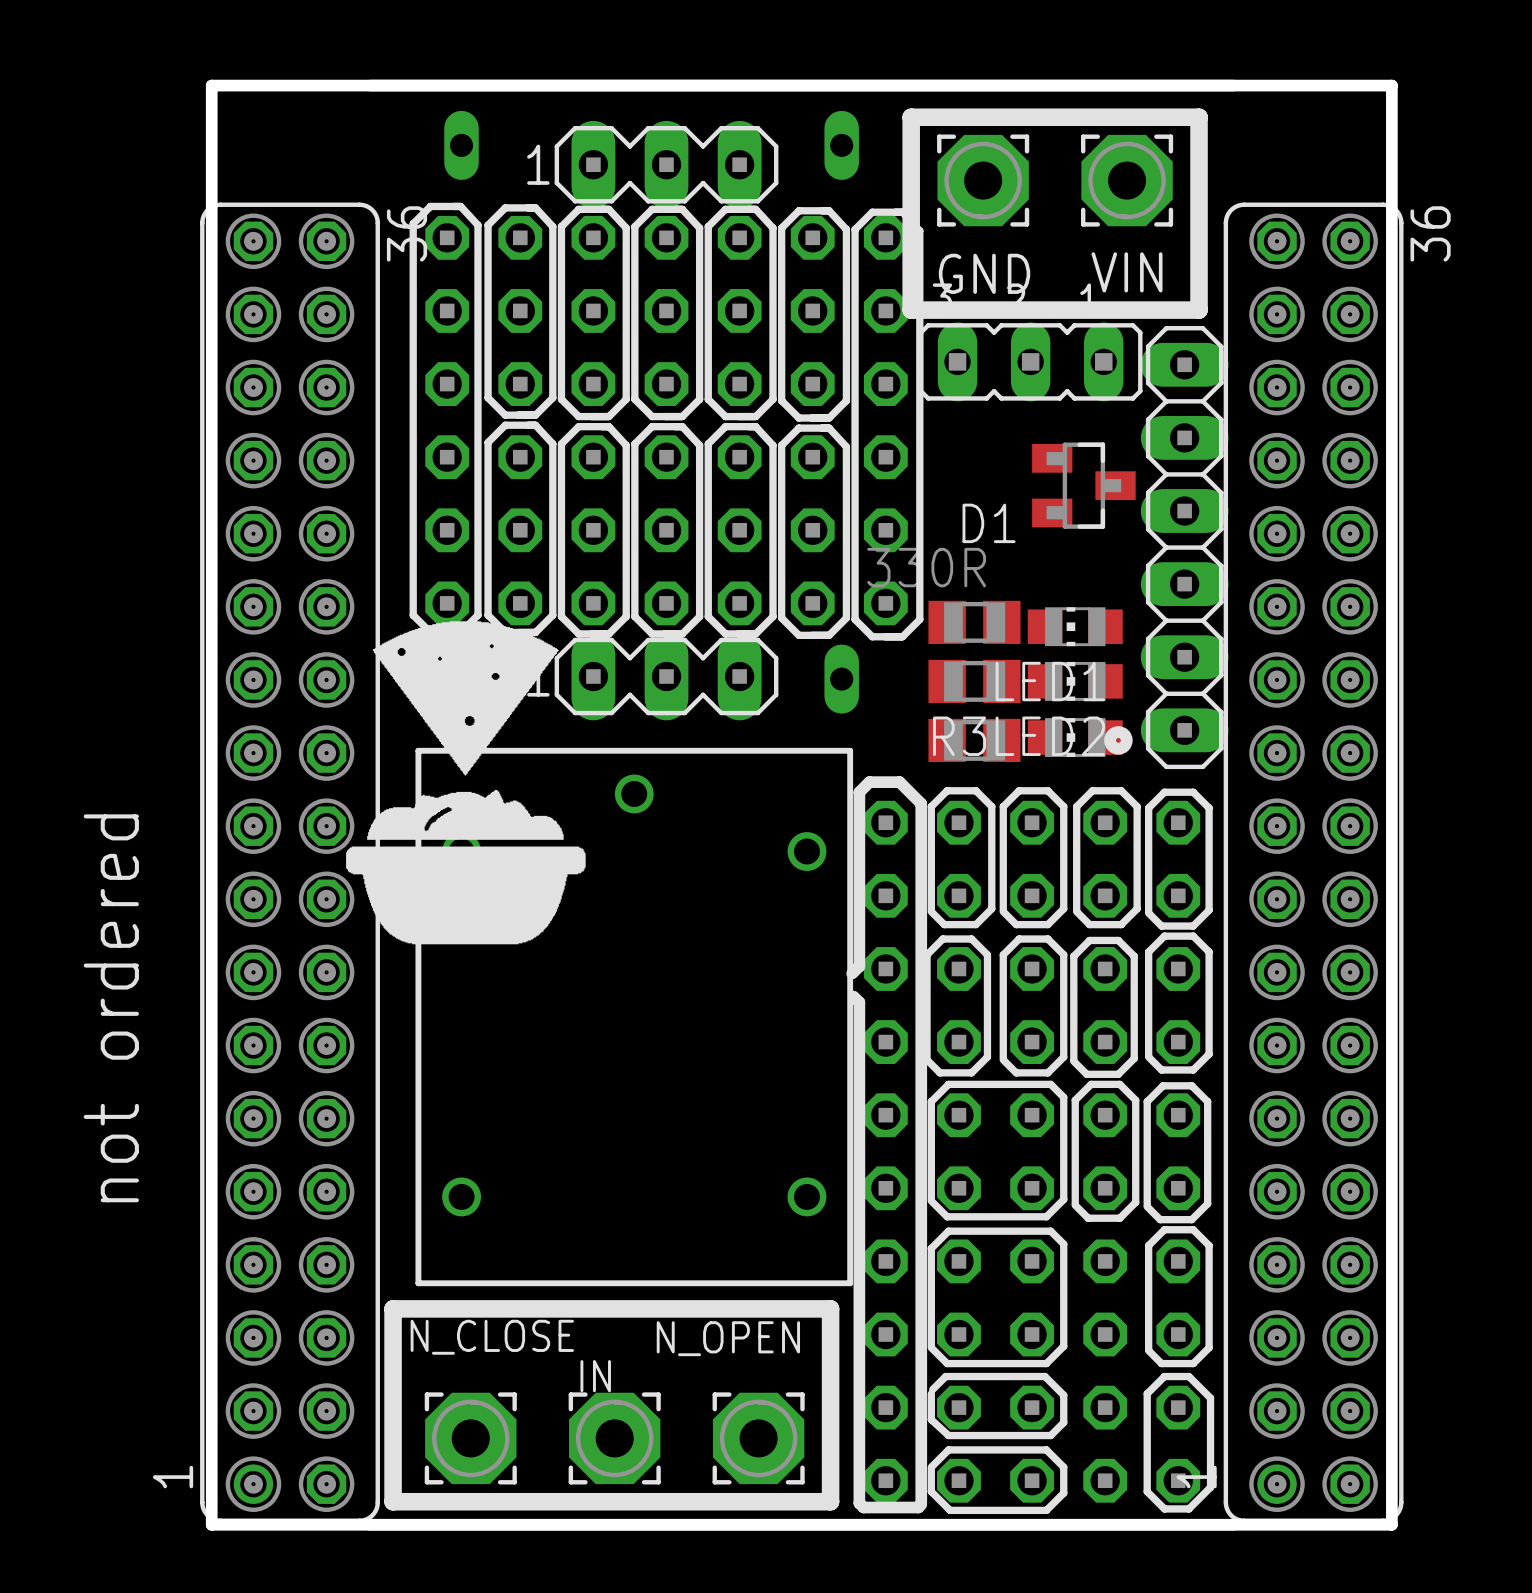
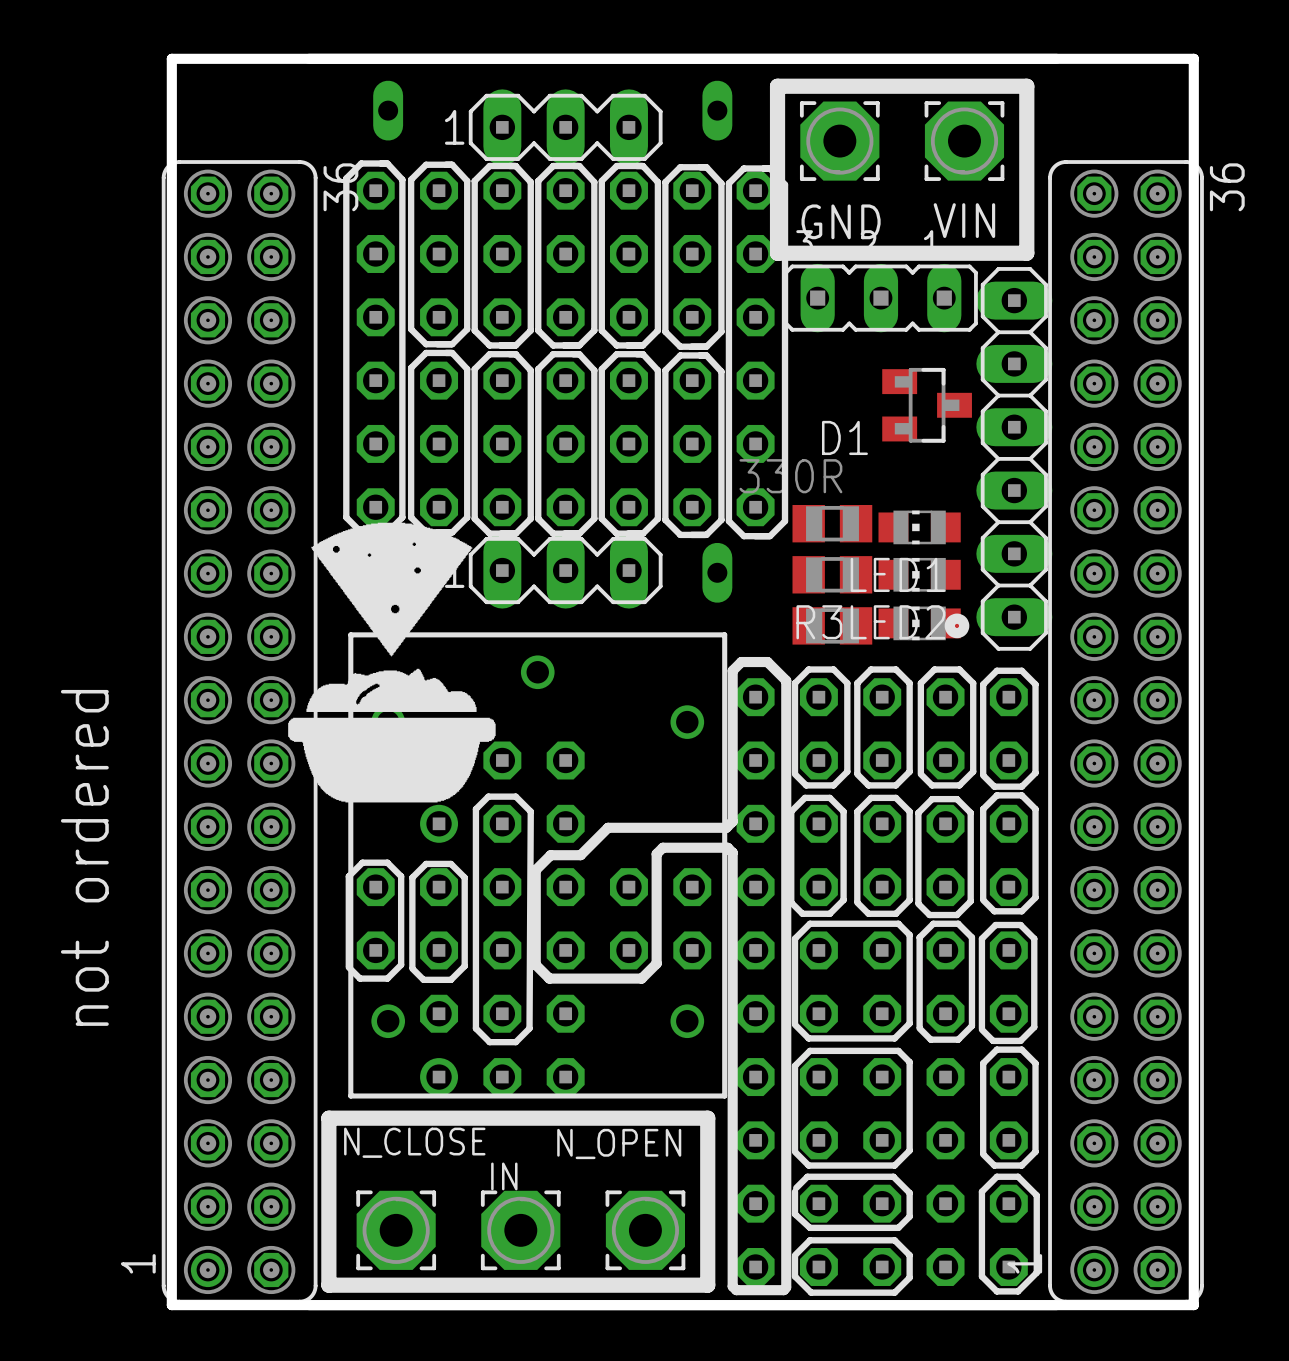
part: none -> (502, 792)
line: none -> (488, 796) (515, 796) (530, 811) (529, 1028) (515, 1042) (489, 1042) (475, 1028) (475, 809) (488, 796)
line: none -> (726, 827) (608, 827) (580, 855) (550, 855) (535, 870) (535, 964) (549, 978) (641, 978) (656, 963) (656, 853) (662, 847) (727, 847)
part: none -> (534, 918)
line: none -> (348, 966) (348, 876) (362, 862) (387, 862) (401, 876) (401, 964) (387, 978) (360, 978) (348, 967)
line: none -> (412, 967) (412, 877) (426, 863) (451, 863) (464, 877) (464, 966) (451, 979) (423, 979) (412, 968)
part: none -> (502, 1045)

